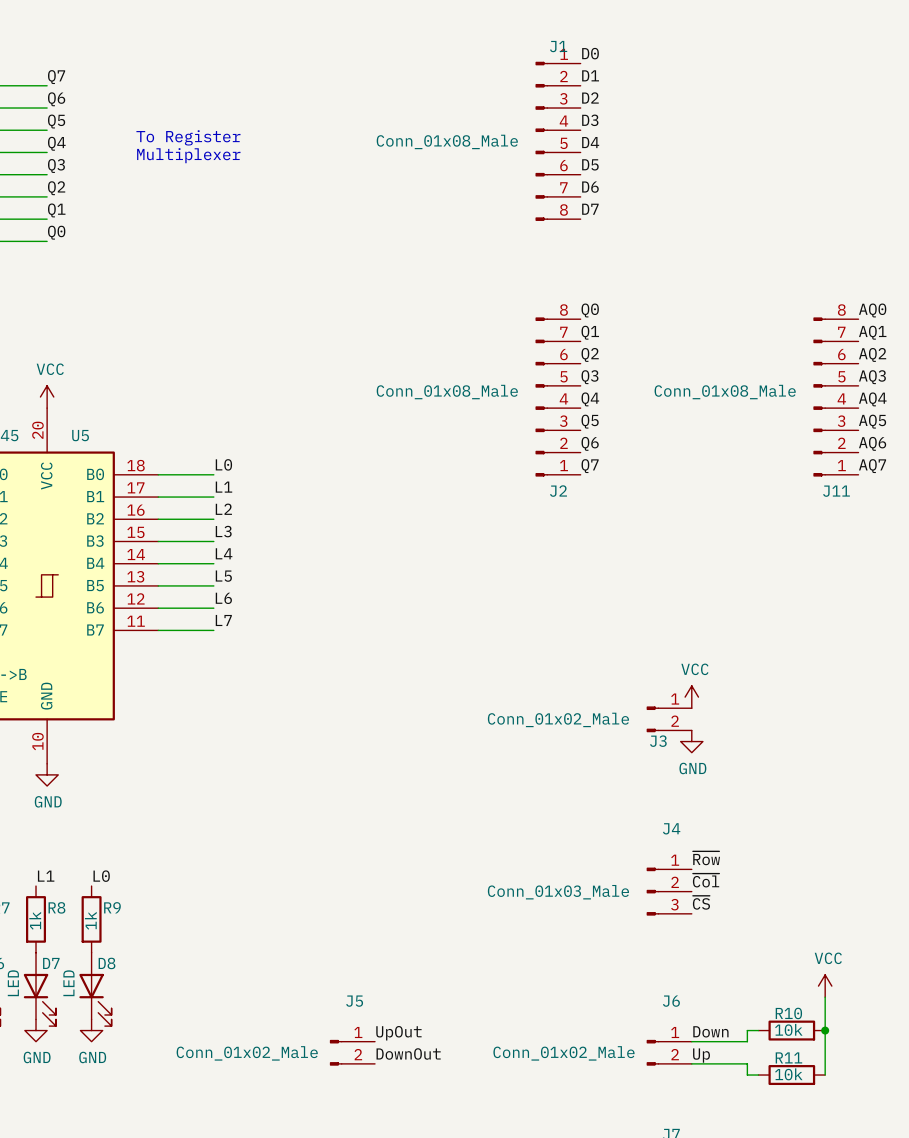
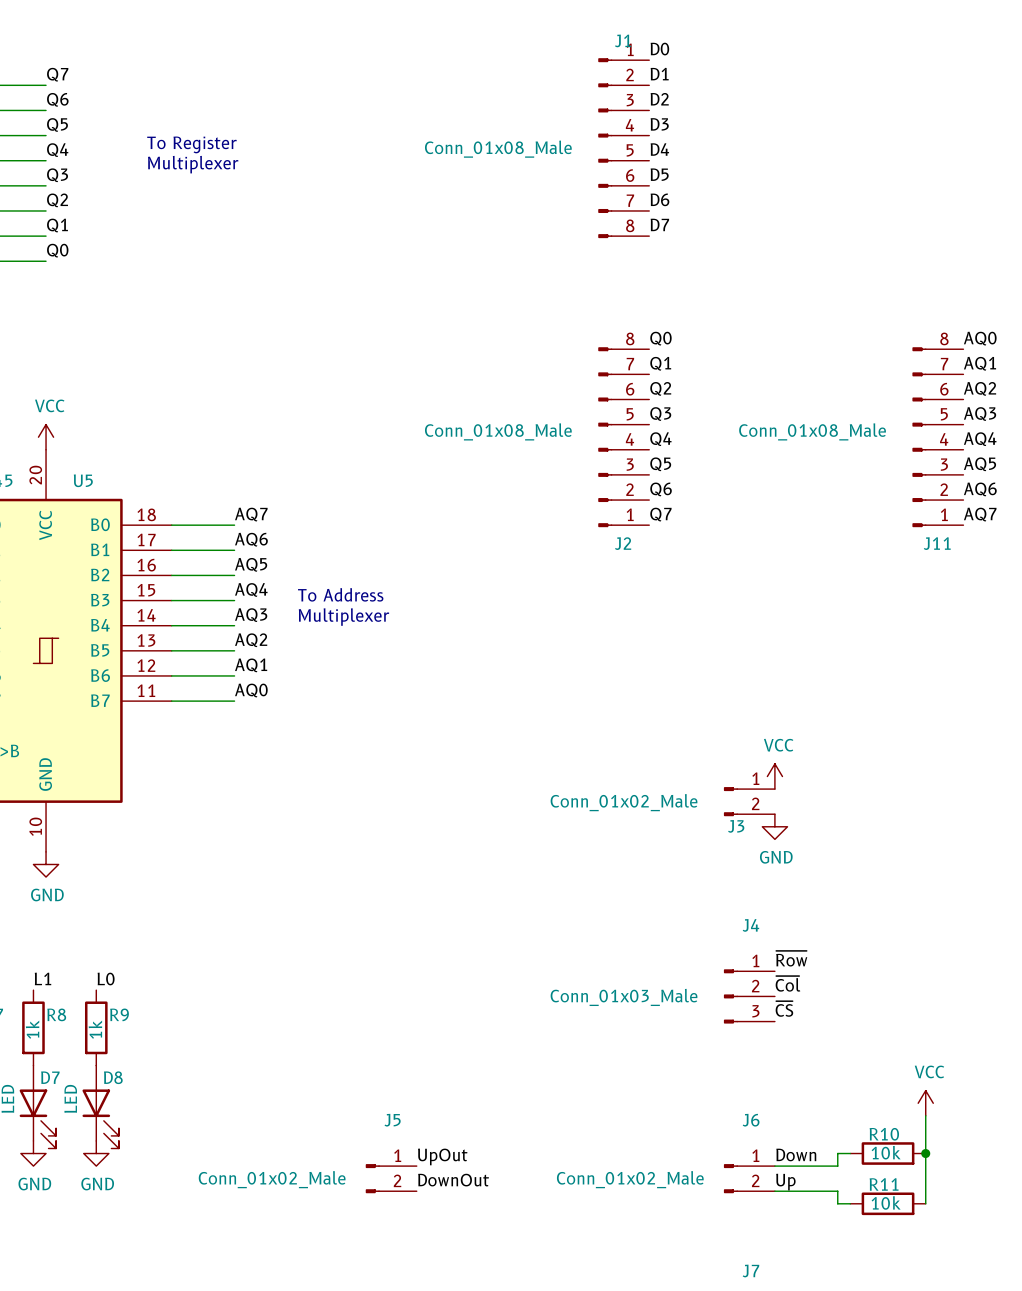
label: L0 (223, 464) -> AQ7 (251, 514)
label: L1 (223, 487) -> AQ6 (251, 539)
label: L2 (223, 509) -> AQ5 (251, 564)
label: L3 (223, 531) -> AQ4 (251, 589)
text: none -> To Address (340, 594)
label: L4 (224, 553) -> AQ3 (251, 615)
text: none -> Multiplexer (343, 617)
label: L5 (223, 576) -> AQ2 (251, 640)
label: L6 (223, 598) -> AQ1 (251, 665)
label: L7 (223, 620) -> AQ0 (251, 690)

